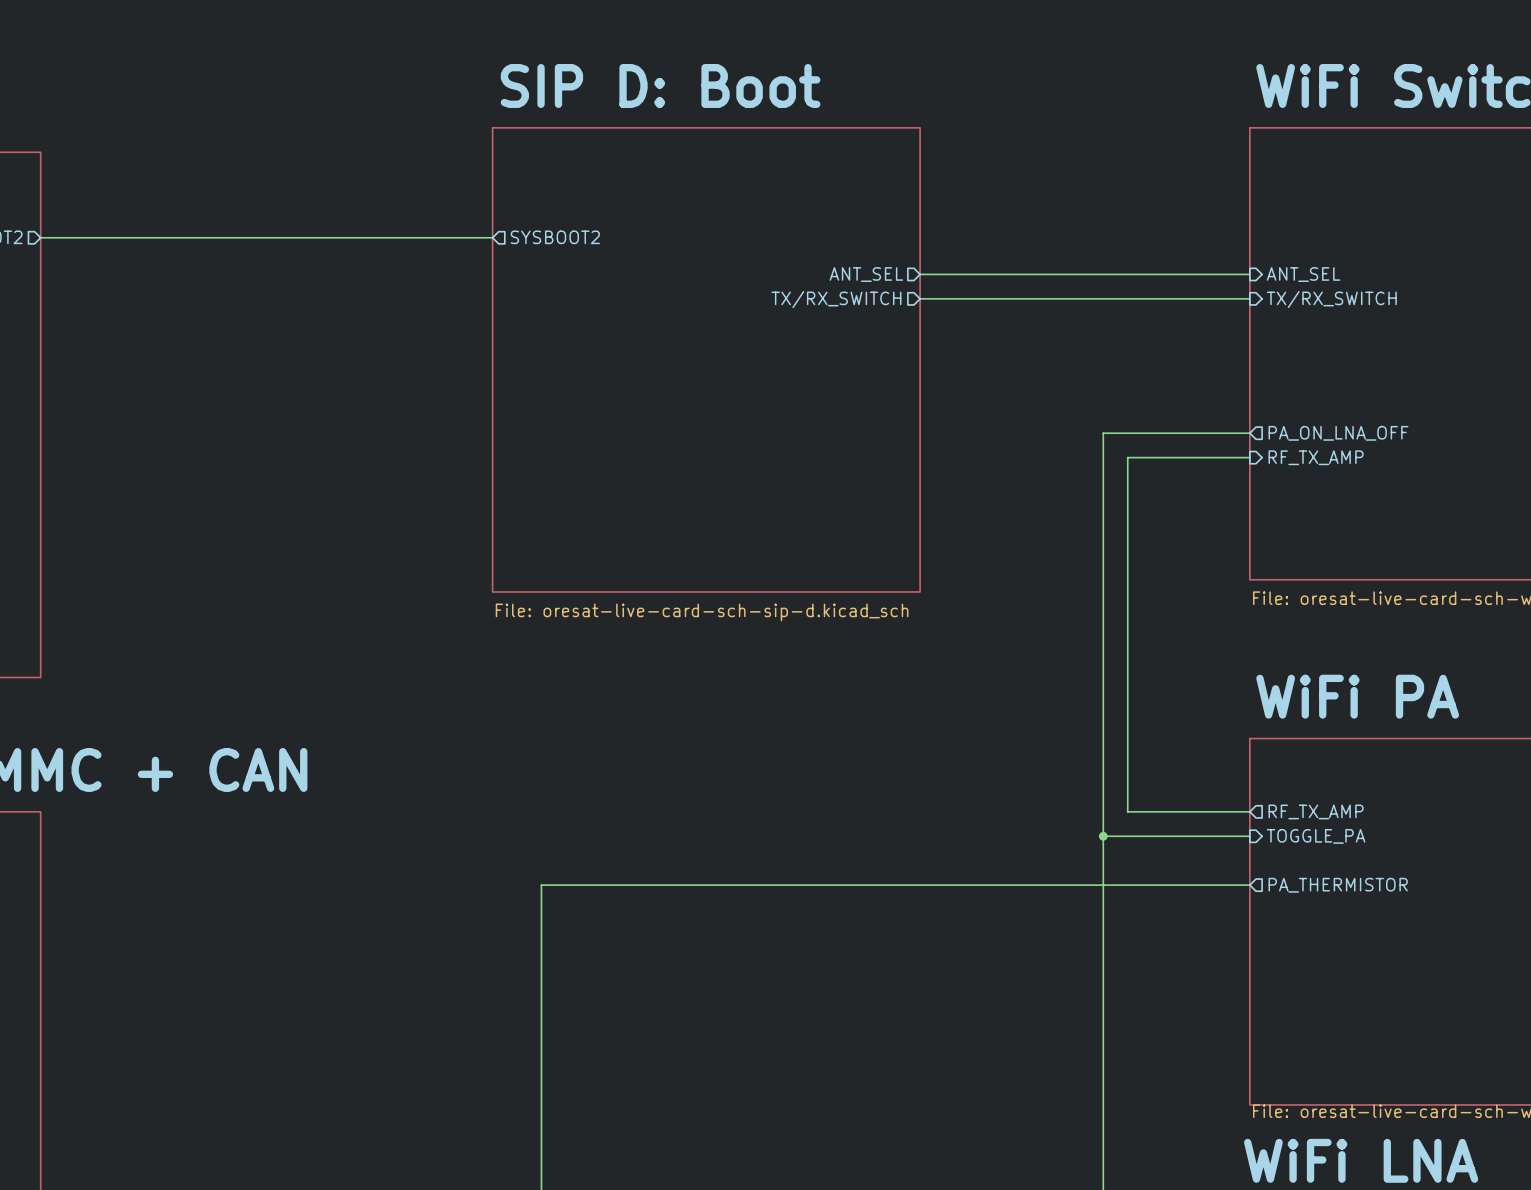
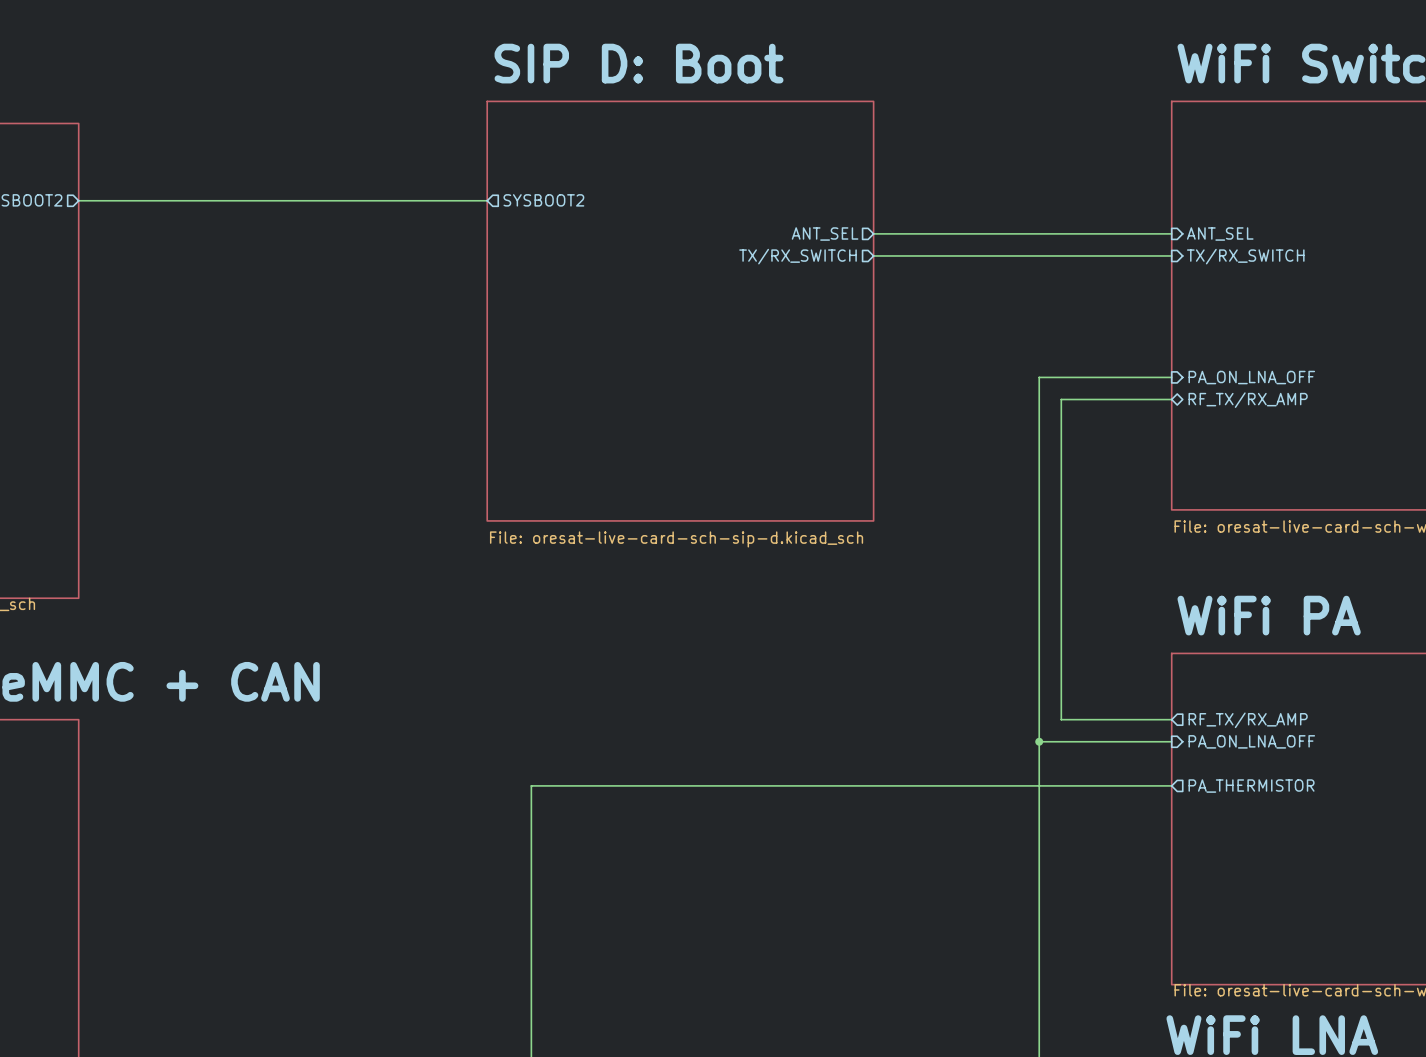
sheet pin shape: output (1338, 433) -> input (1251, 377)
sheet pin shape: input (1316, 457) -> bidirectional (1248, 400)
sheet pin: RF_TX_AMP (1316, 457) -> RF_TX/RX_AMP (1248, 400)
sheet pin: RF_TX_AMP (1316, 811) -> RF_TX/RX_AMP (1248, 720)
sheet pin: TOGGLE_PA (1316, 836) -> PA_ON_LNA_OFF (1251, 741)

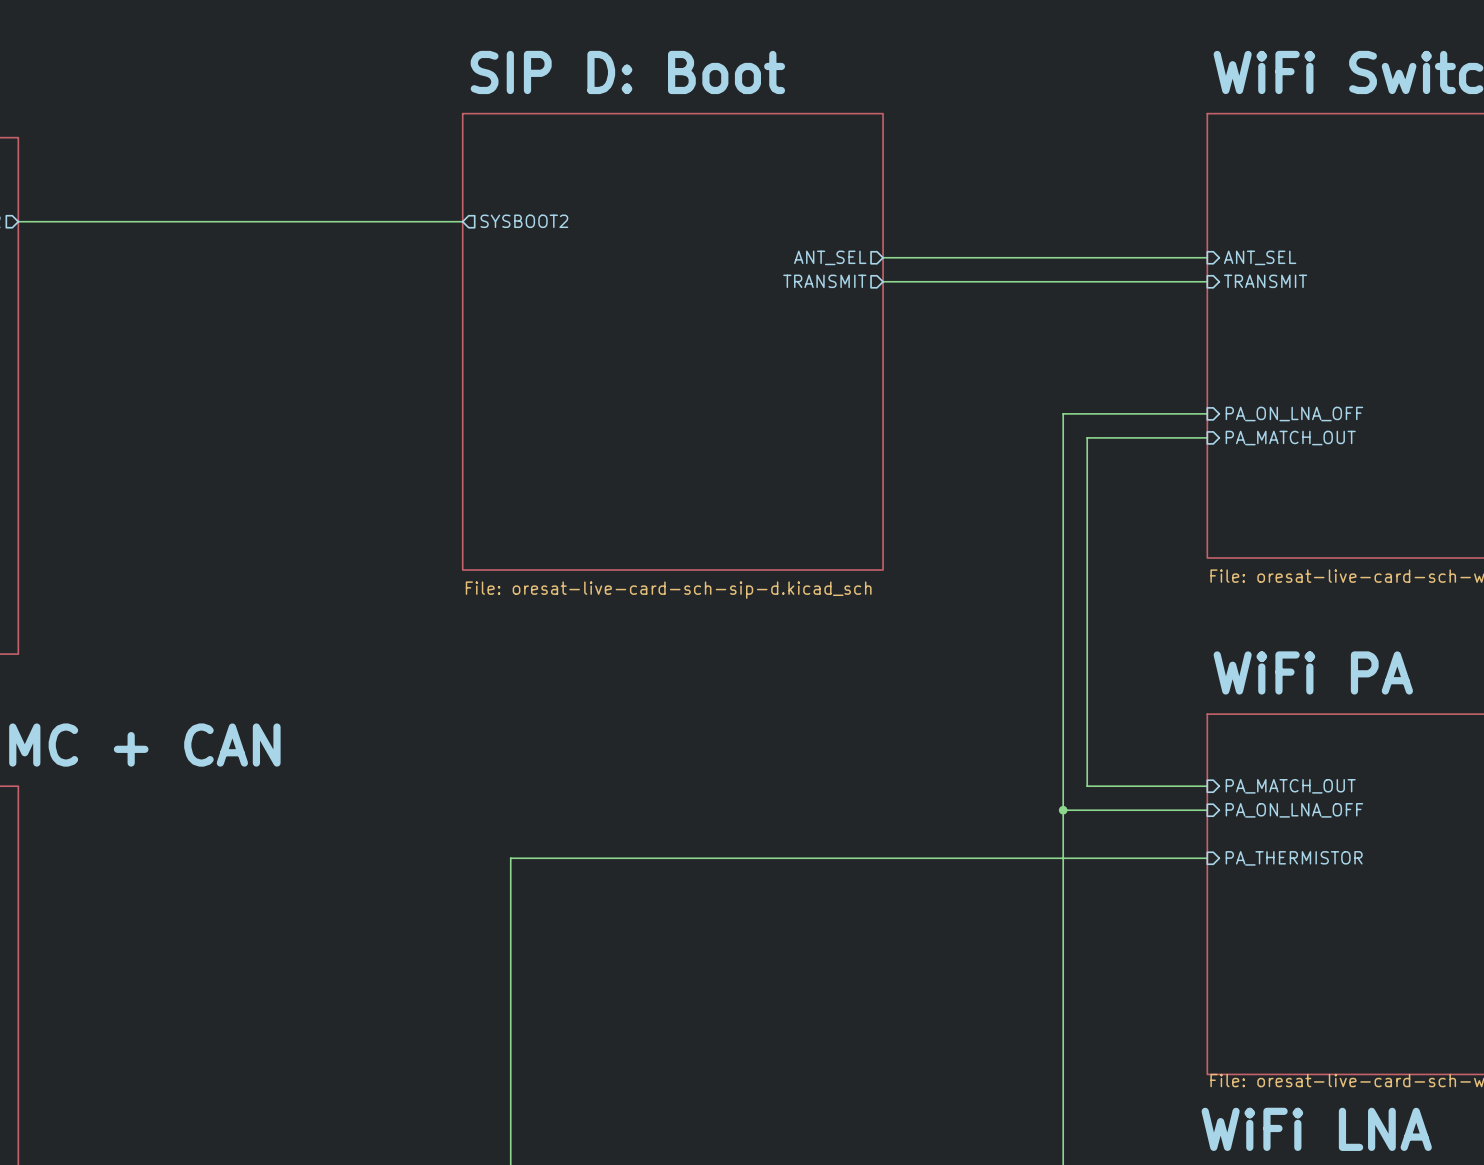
sheet pin: TX/RX_SWITCH (798, 256) -> TRANSMIT (824, 281)
sheet pin: TX/RX_SWITCH (1245, 256) -> TRANSMIT (1265, 281)
sheet pin shape: bidirectional (1248, 400) -> input (1290, 438)
sheet pin: RF_TX/RX_AMP (1248, 400) -> PA_MATCH_OUT (1290, 438)
sheet pin shape: output (1248, 720) -> input (1290, 786)
sheet pin: RF_TX/RX_AMP (1248, 720) -> PA_MATCH_OUT (1290, 786)
sheet pin shape: output (1251, 786) -> input (1294, 858)

